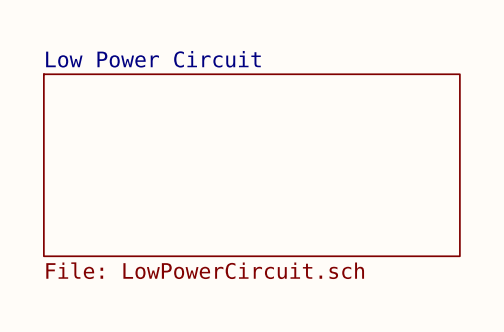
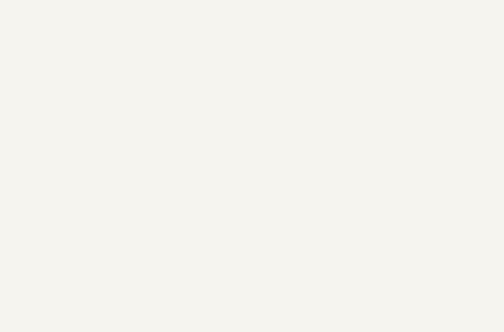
sheet Low Power Circuit: File: LowPowerCircuit.sch (251, 165) -> none

